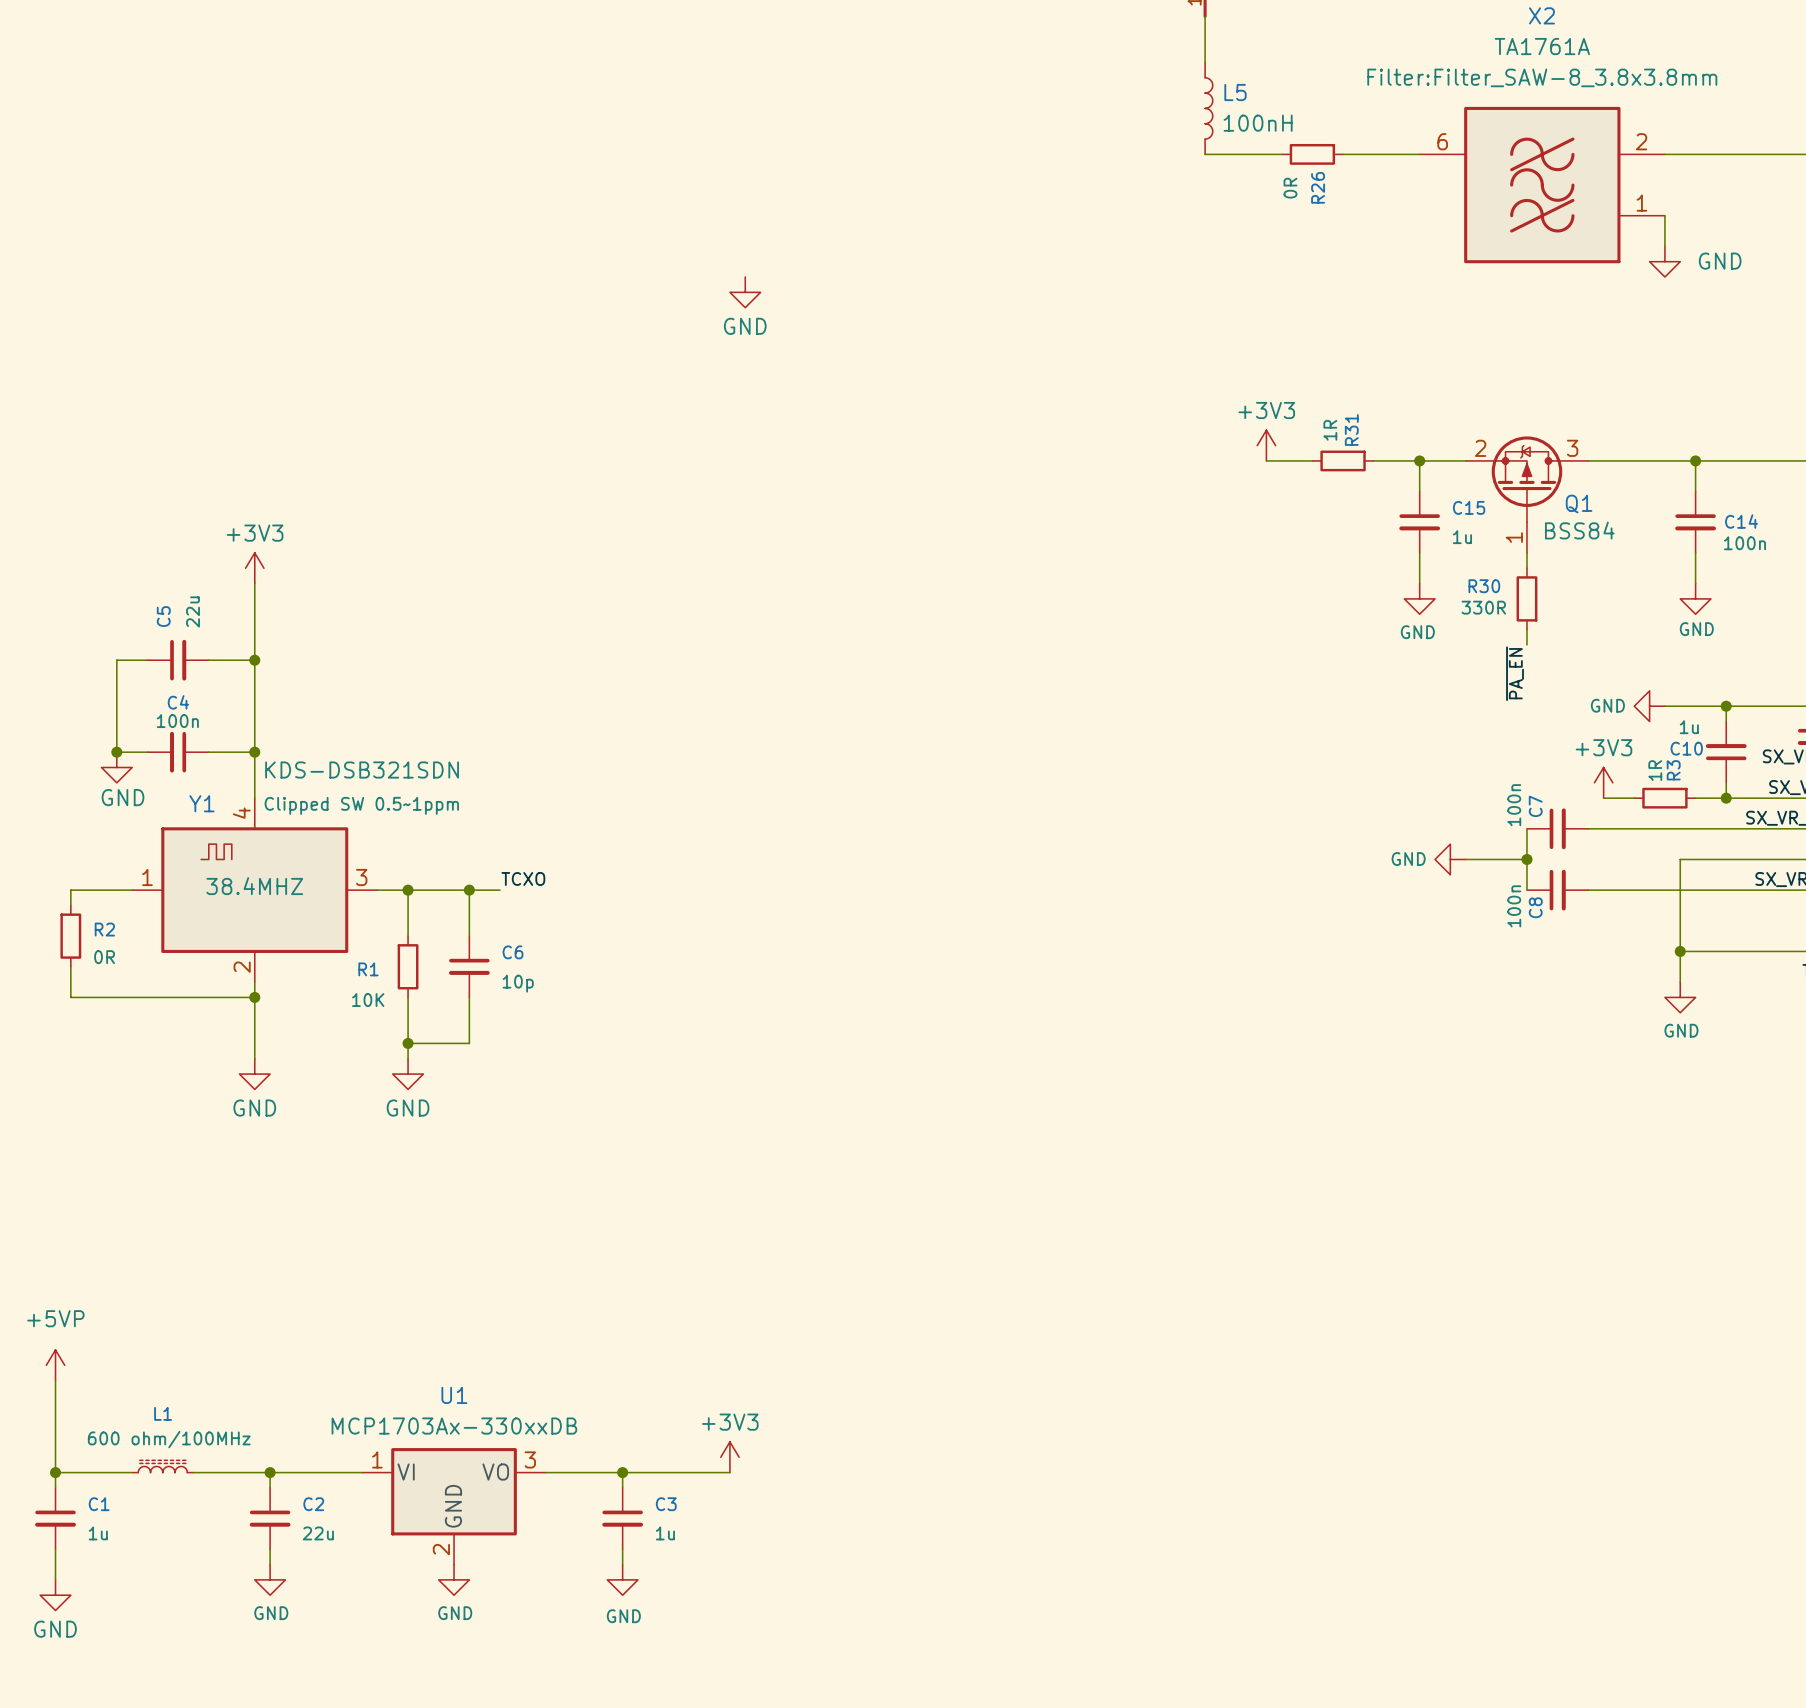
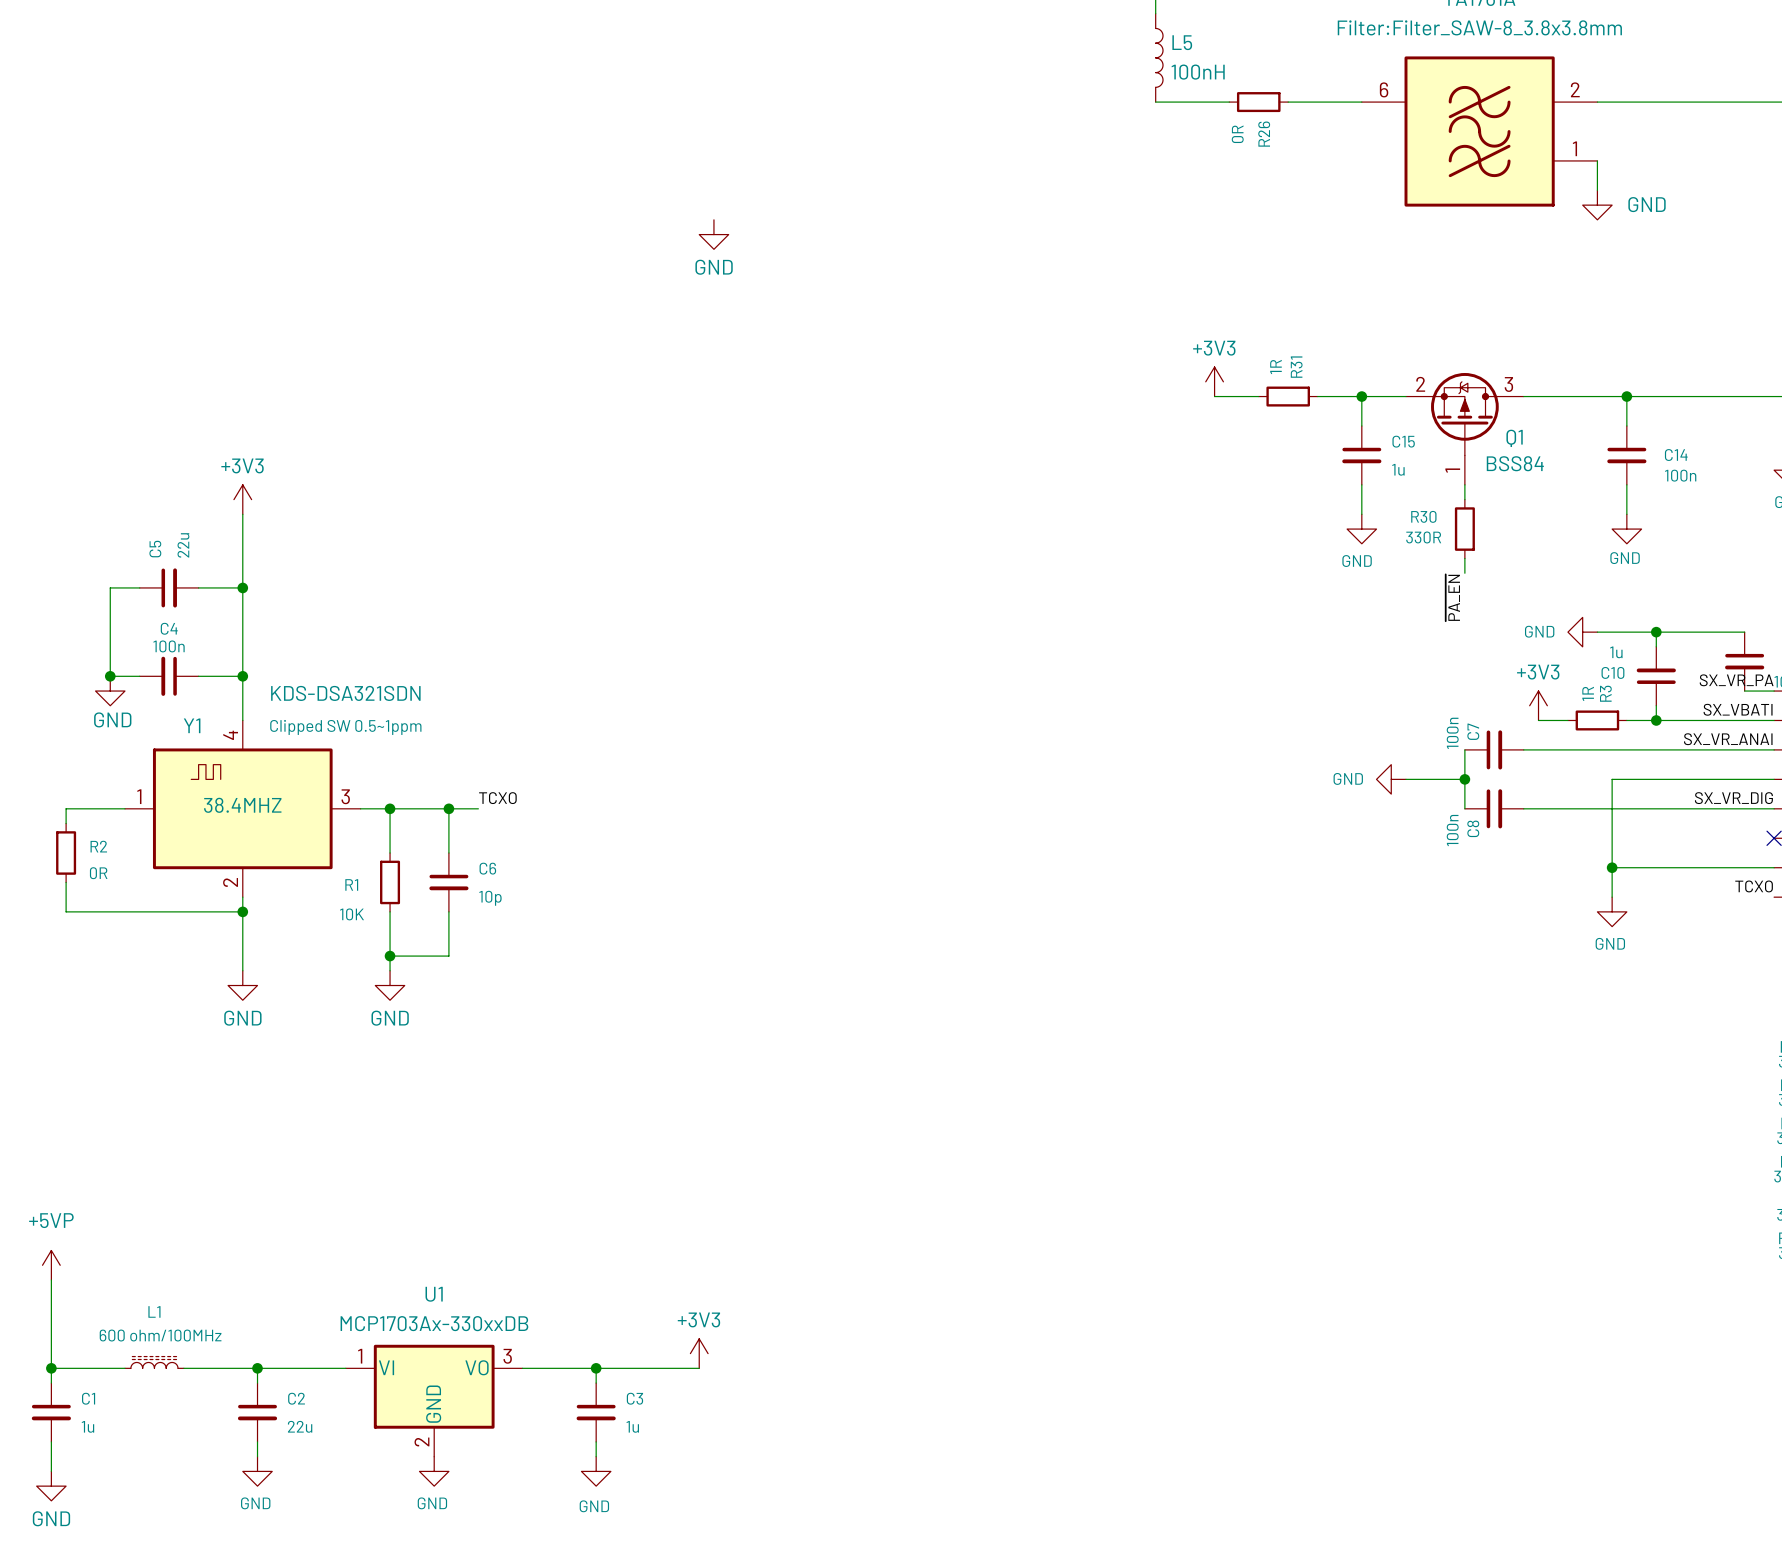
Y1 text: KDS-DSB321SDN (362, 770) -> KDS-DSA321SDN (345, 693)

